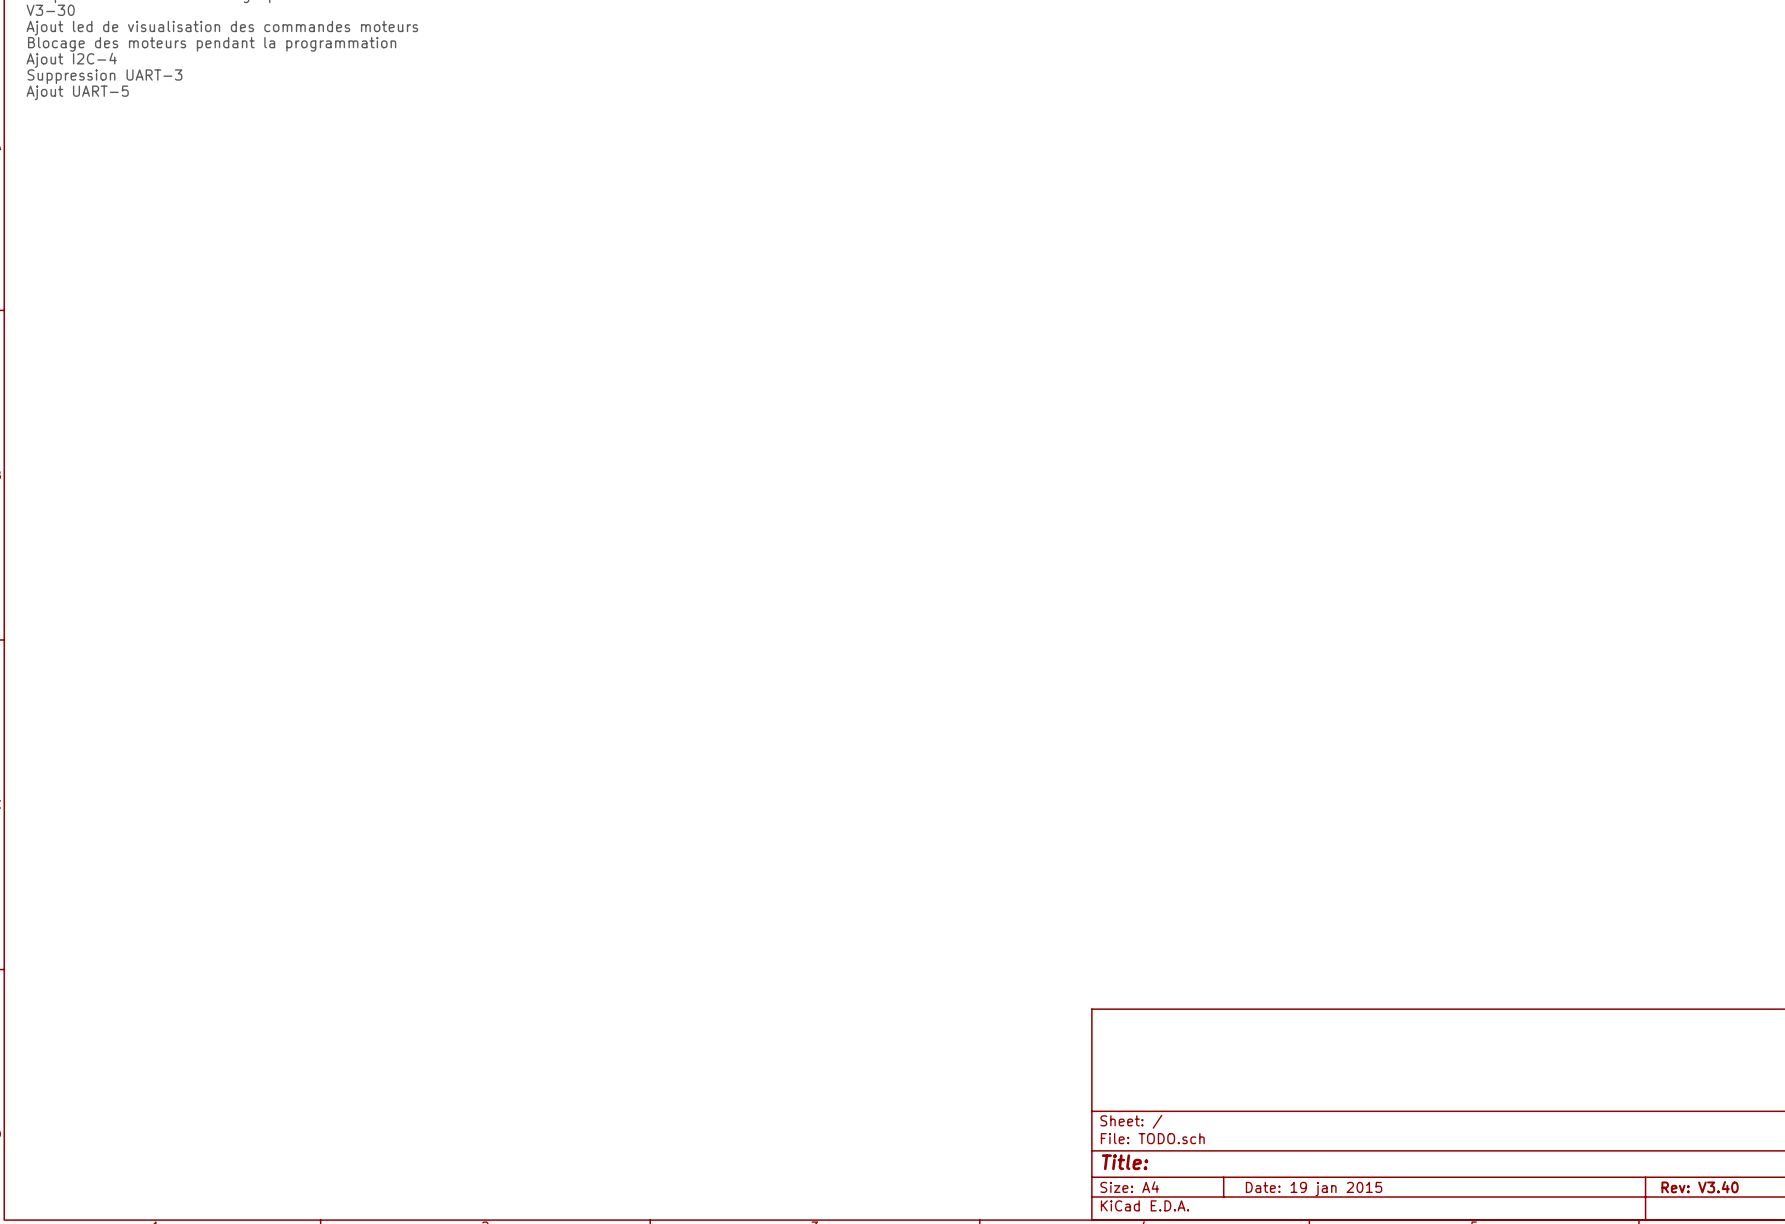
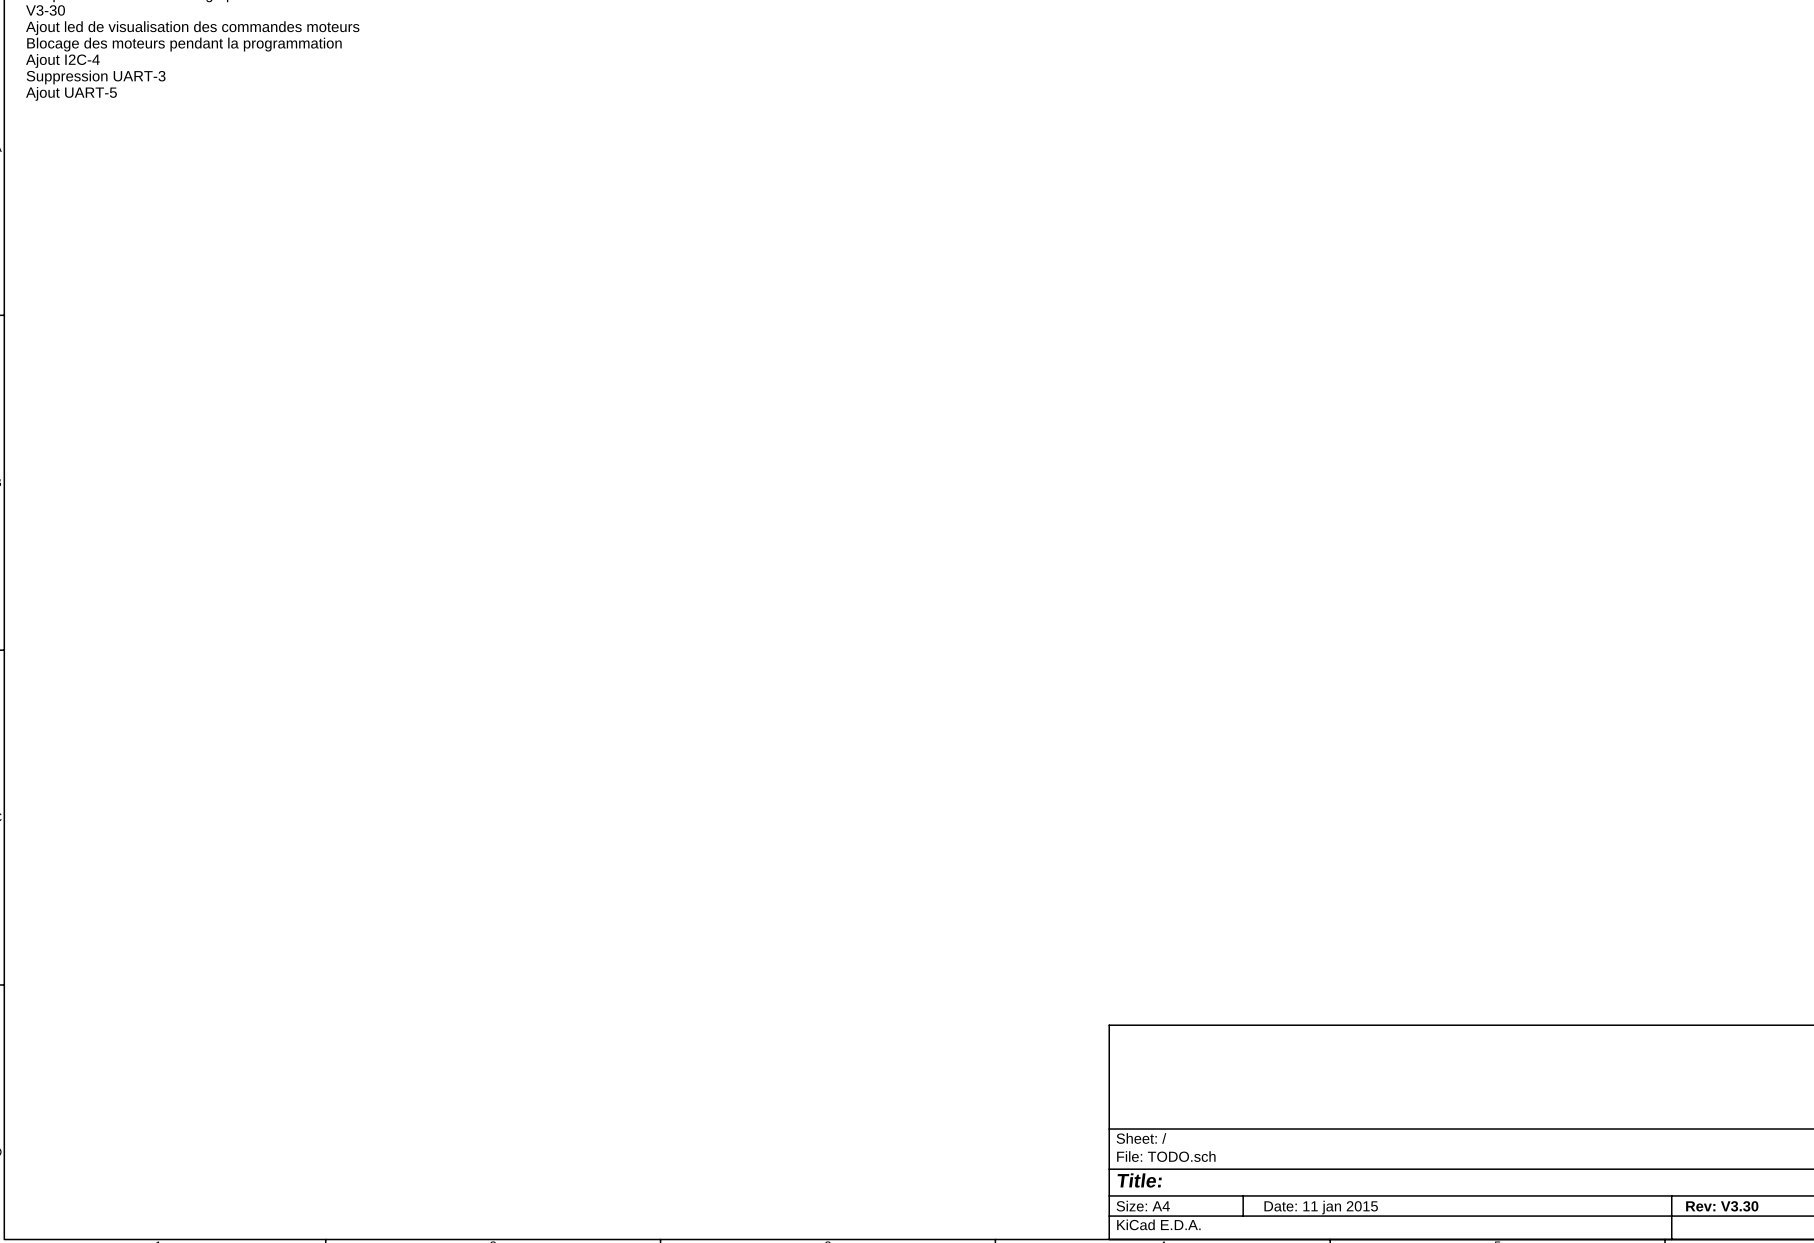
title block: Rev: V3.40 (1700, 1187) -> Rev: V3.30 (1722, 1206)
title block: Date: 19 jan 2015 (1314, 1189) -> Date: 11 jan 2015 (1321, 1207)

